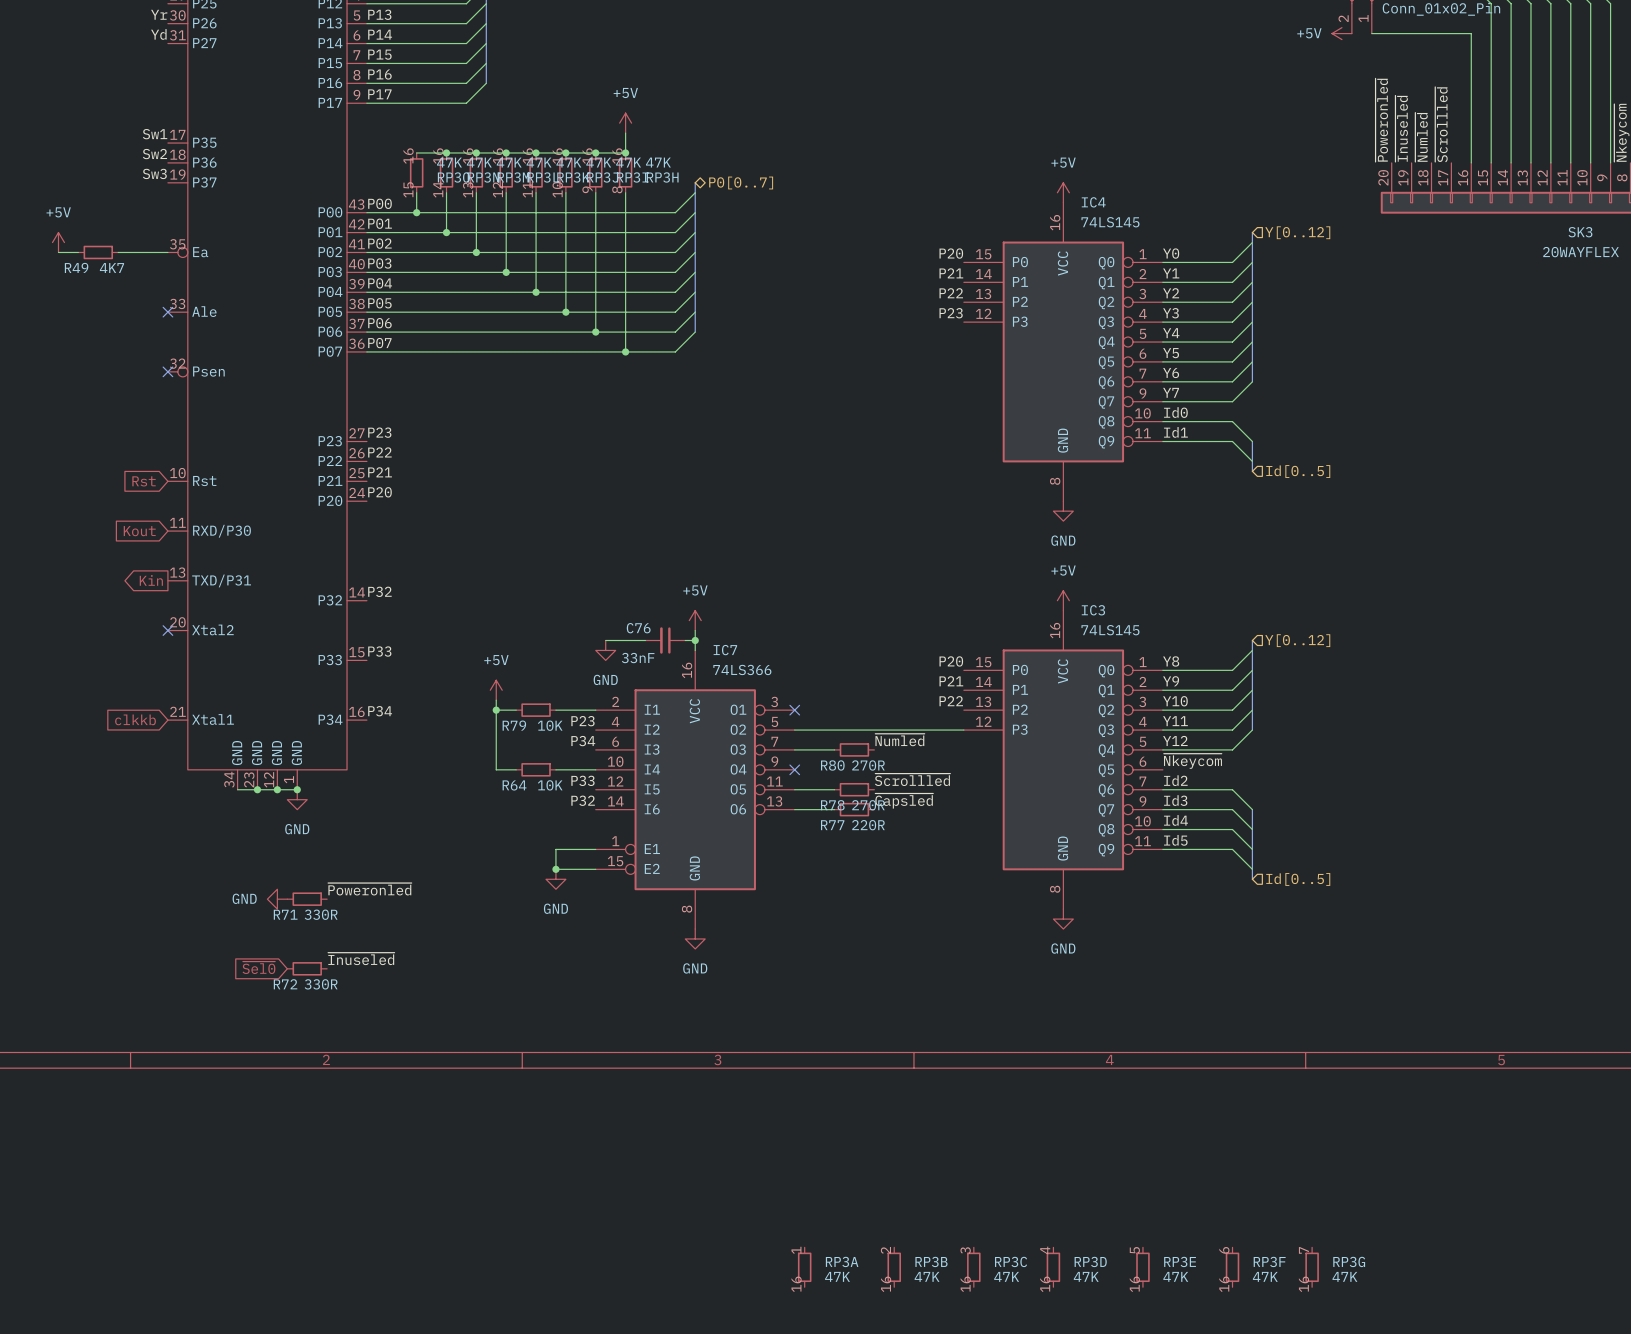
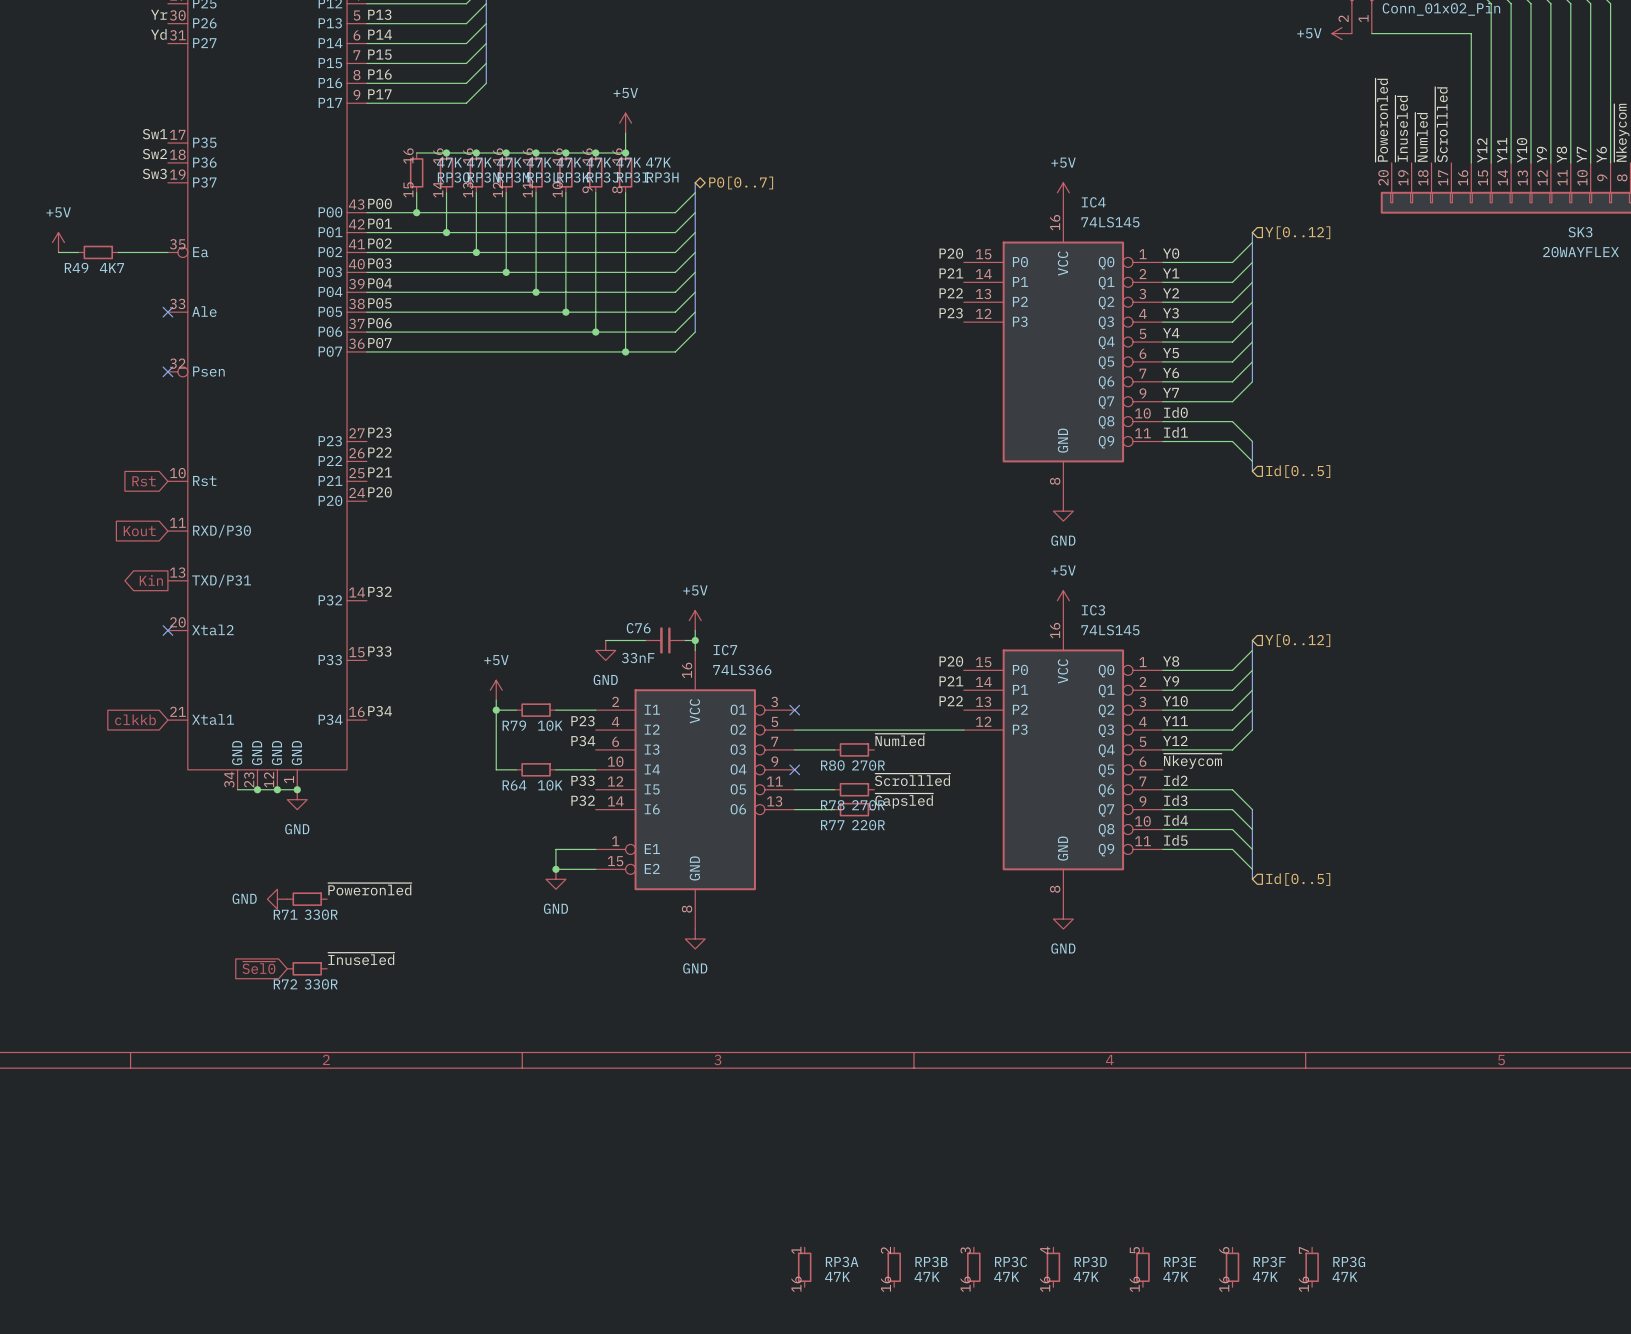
label: none -> Y12 (1482, 150)
label: none -> Y11 (1502, 150)
label: none -> Y10 (1522, 150)
label: none -> Y9 (1541, 154)
label: none -> Y8 (1561, 154)
label: none -> Y7 (1581, 154)
label: none -> Y6 (1601, 154)

